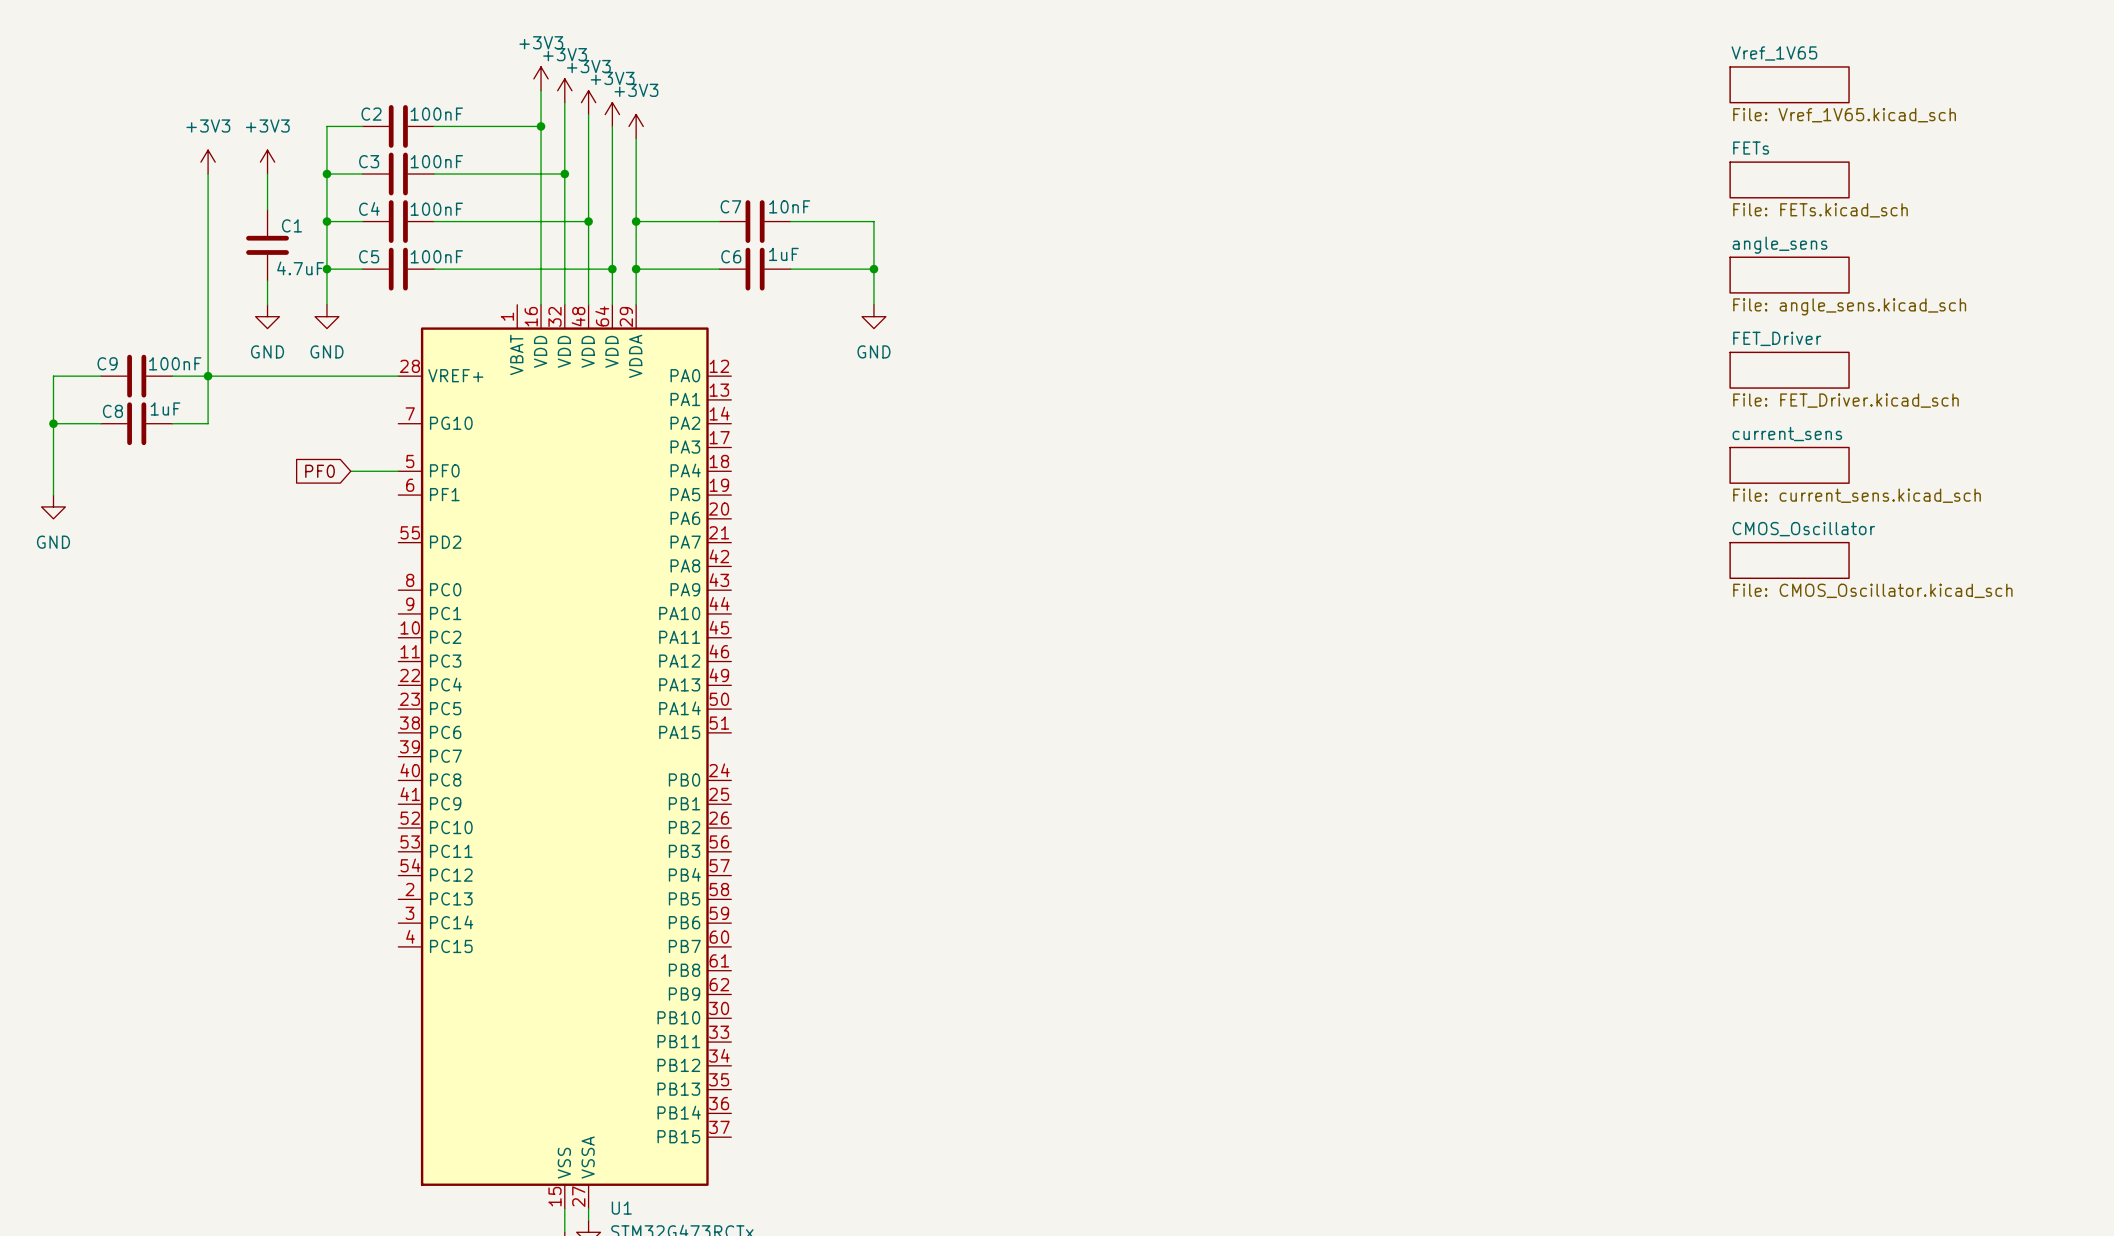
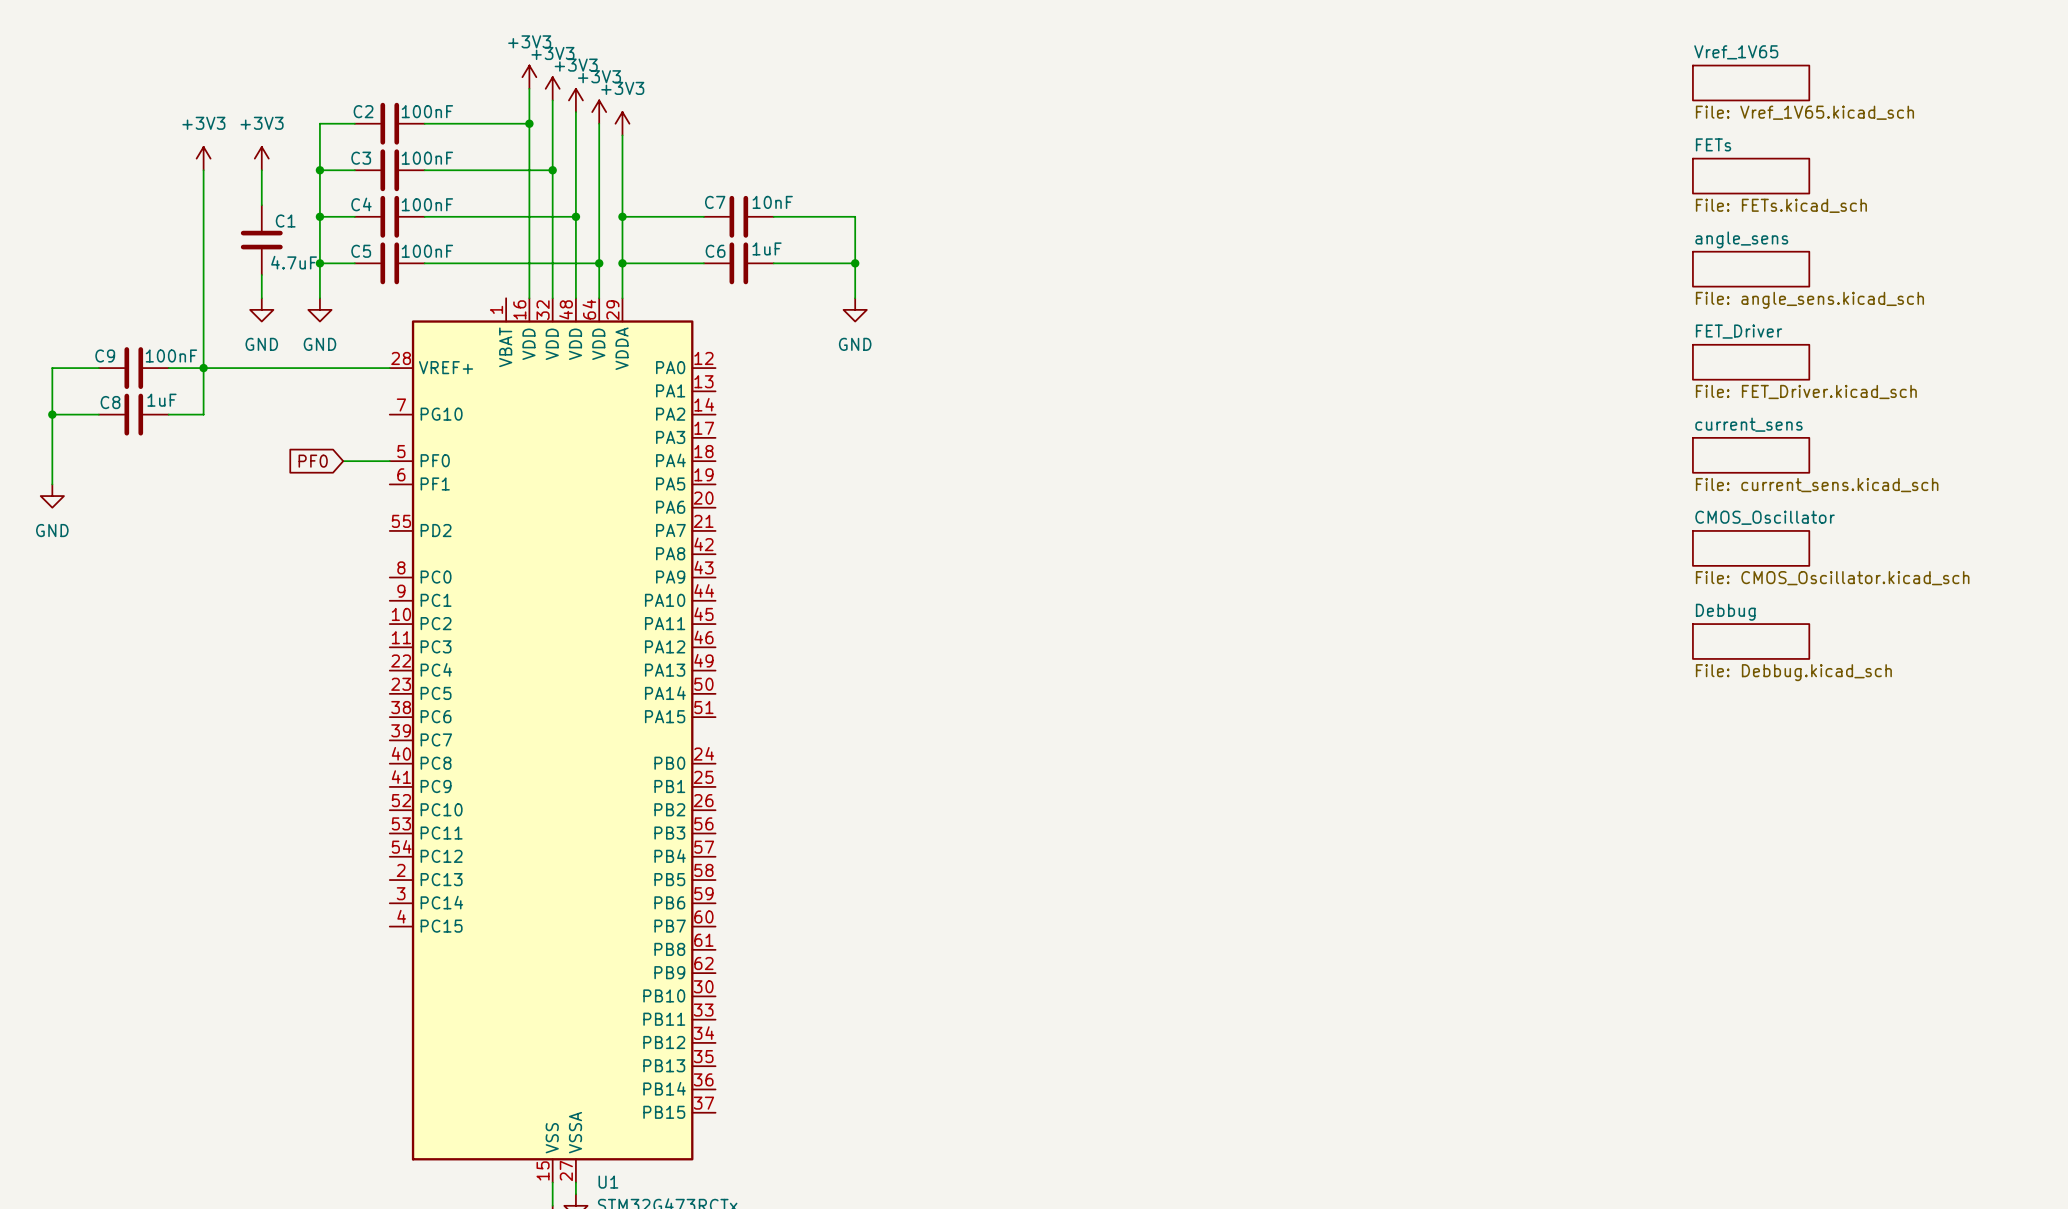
sheet Debbug: none -> File: Debbug.kicad_sch (1751, 641)

